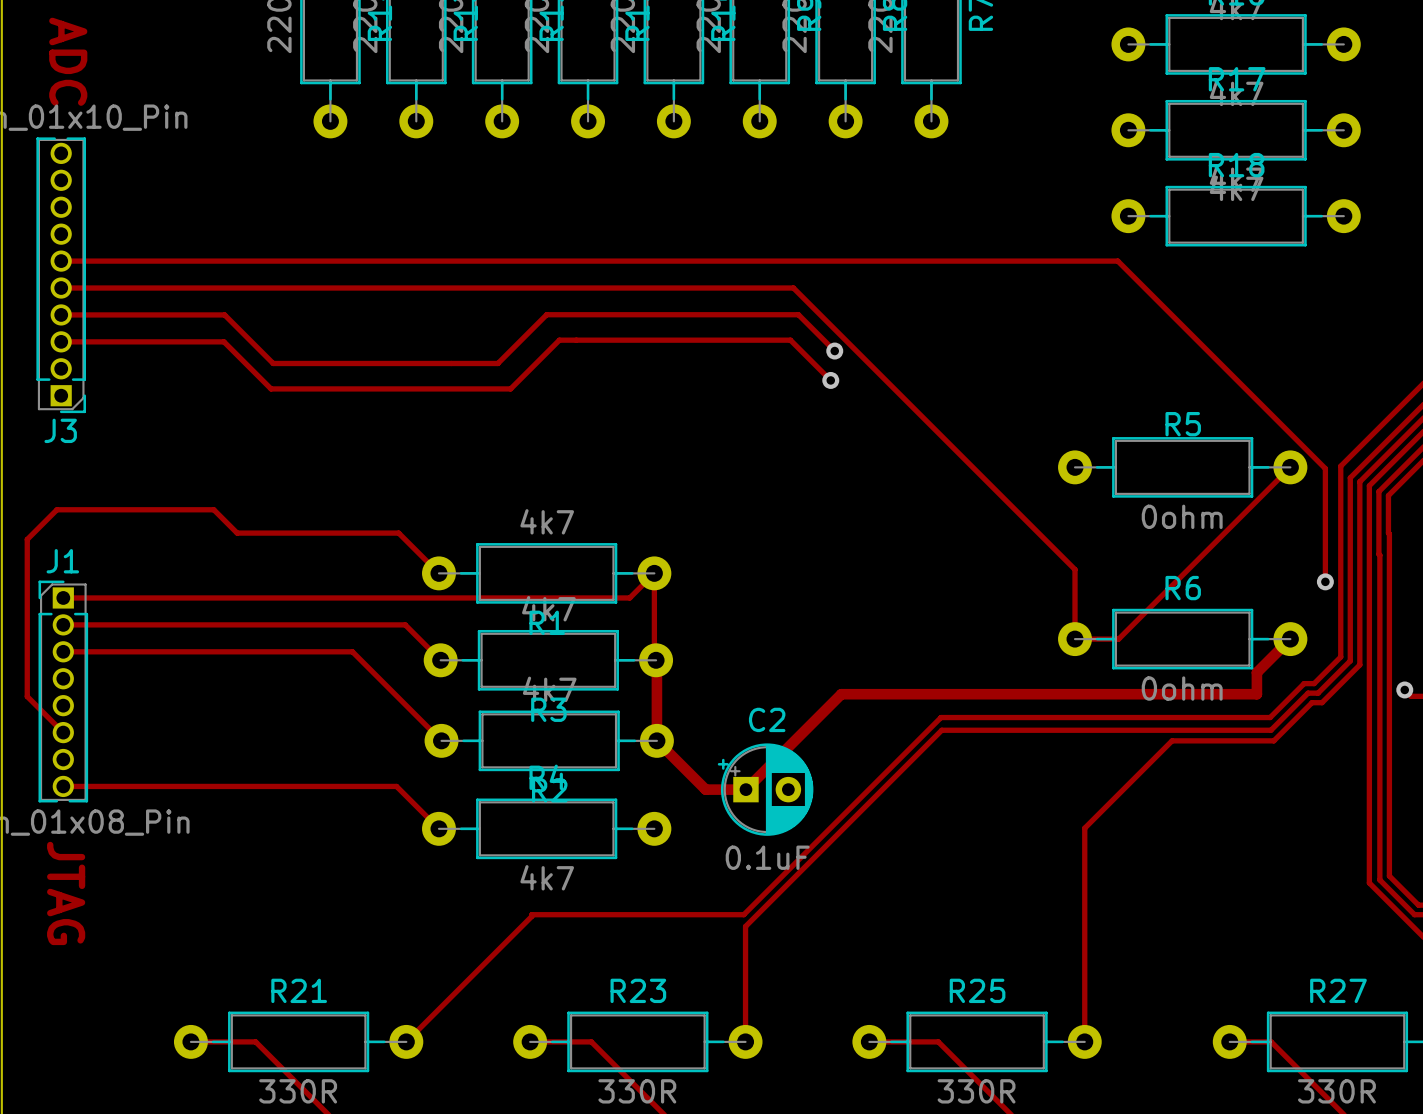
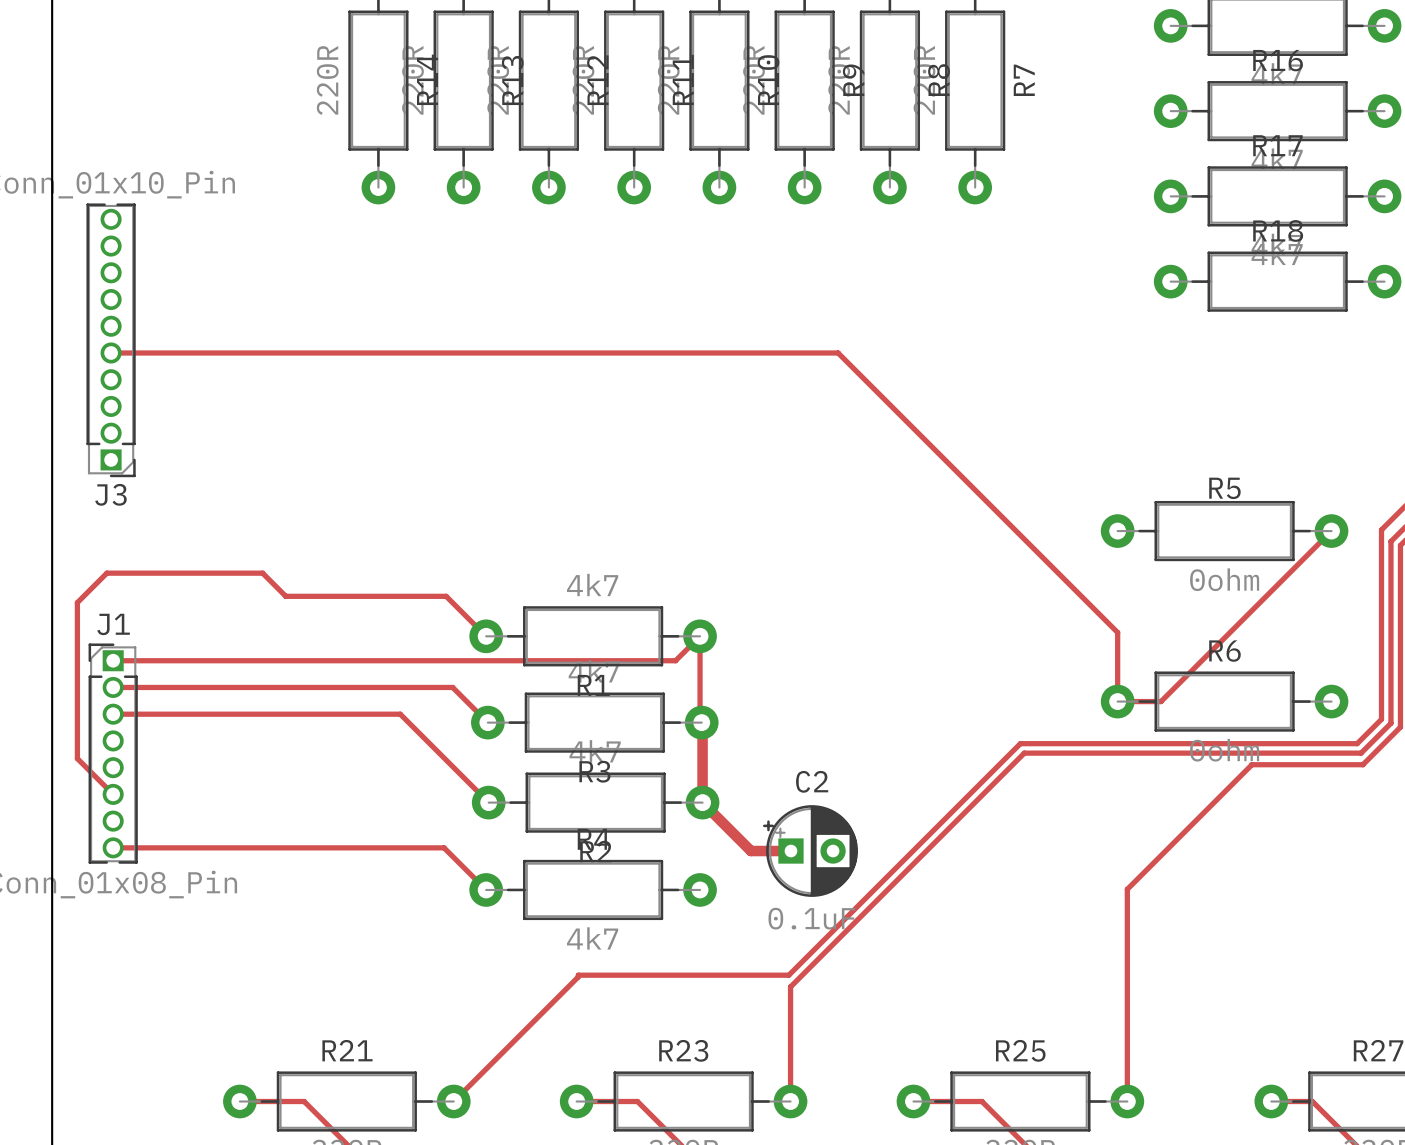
text: ADC (68, 61) -> none
track: (61, 261) (1117, 261) (1325, 468) (1325, 581) -> none
track: (61, 314) (224, 314) (273, 363) (497, 363) (546, 314) (798, 314) (834, 351) -> none
track: (61, 341) (224, 341) (271, 388) (510, 388) (559, 340) (790, 340) (830, 380) -> none
via: (834, 351) -> none
via: (830, 380) -> none
via: (1325, 581) -> none
track: (1290, 639) (1256, 672) (1256, 694) (841, 694) (745, 789) -> none
track: (1316, 681) (1314, 683) (1304, 683) (1270, 717) (941, 717) -> (1357, 743) (1020, 743) (984, 779)
track: (1320, 691) (1318, 693) (1308, 693) (1270, 730) (941, 730) -> (1361, 753) (1024, 753) (985, 792)
track: (1312, 702) (1273, 740) (1172, 740) -> (1352, 764) (1251, 764) (1214, 802)
text: JTAG (66, 893) -> none

